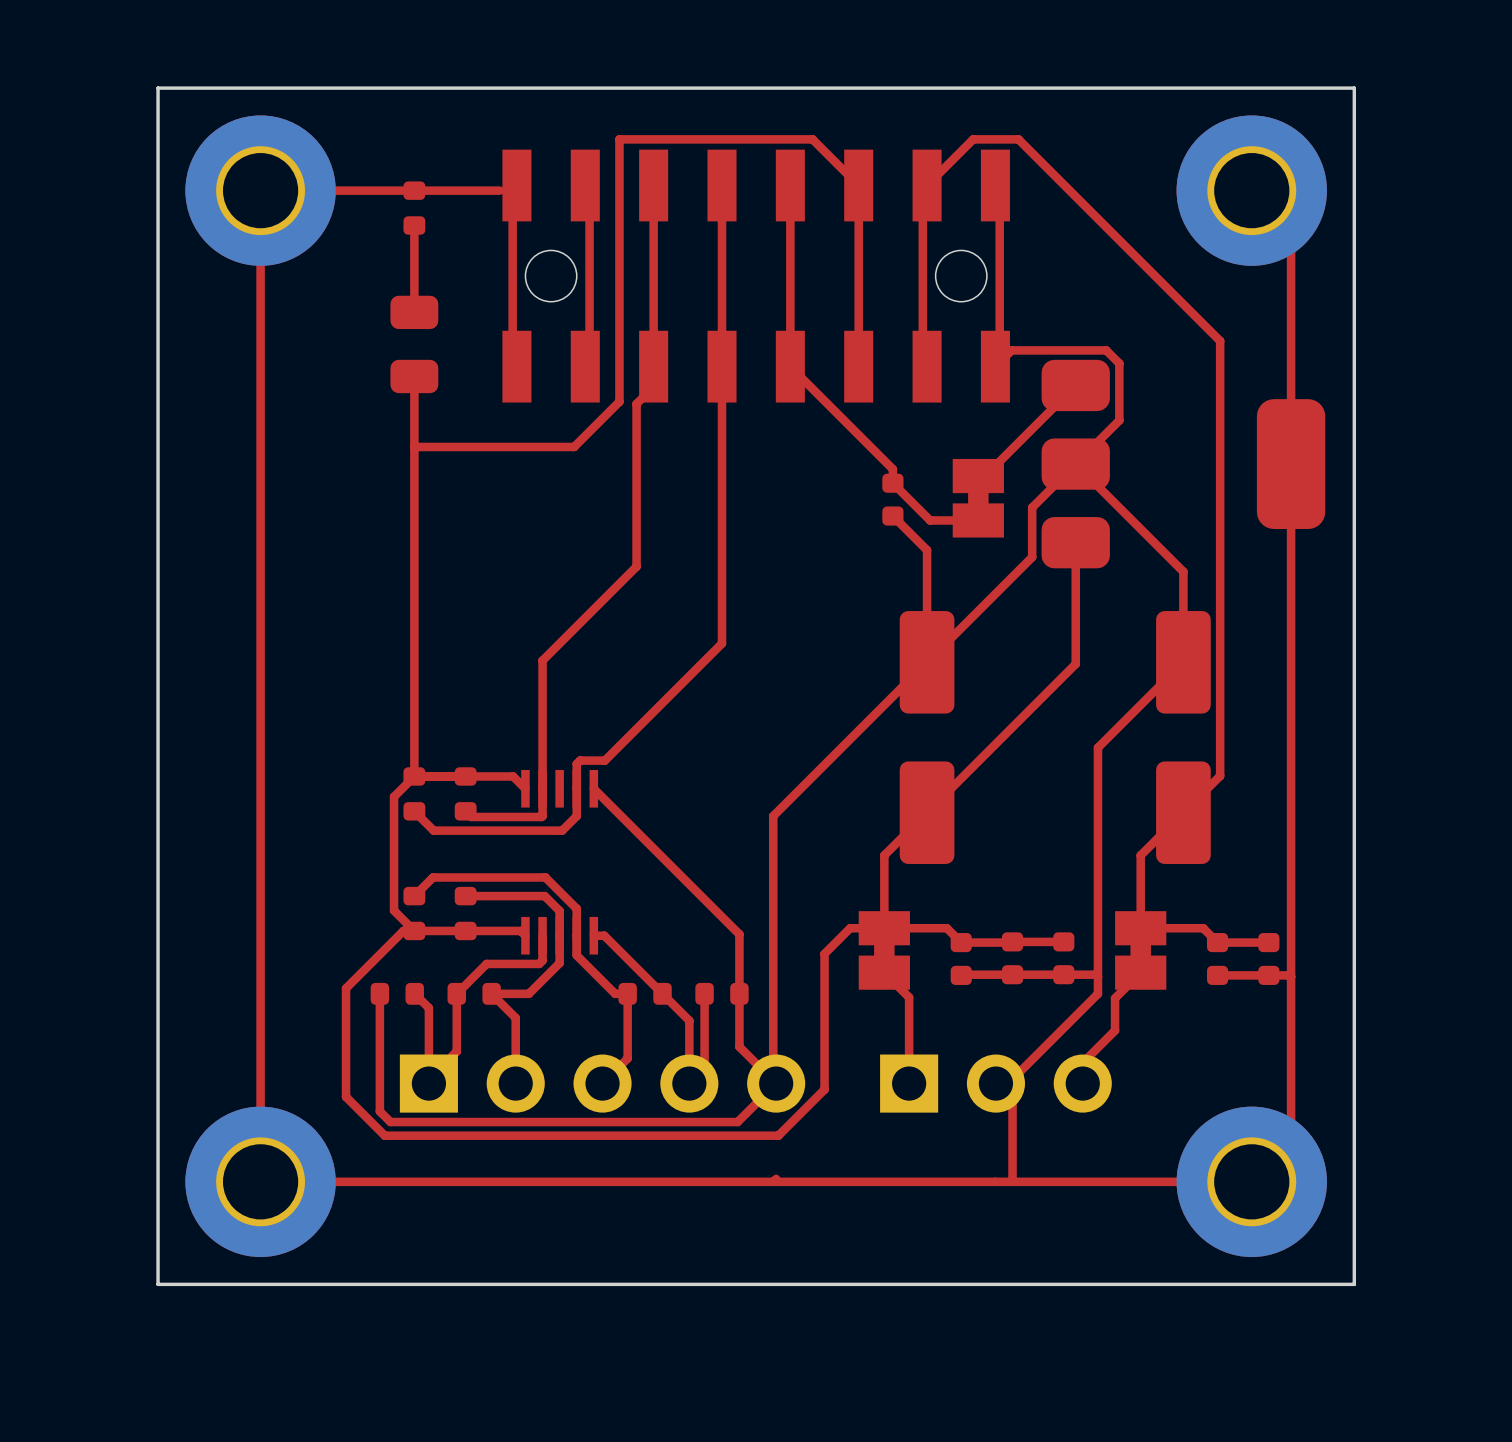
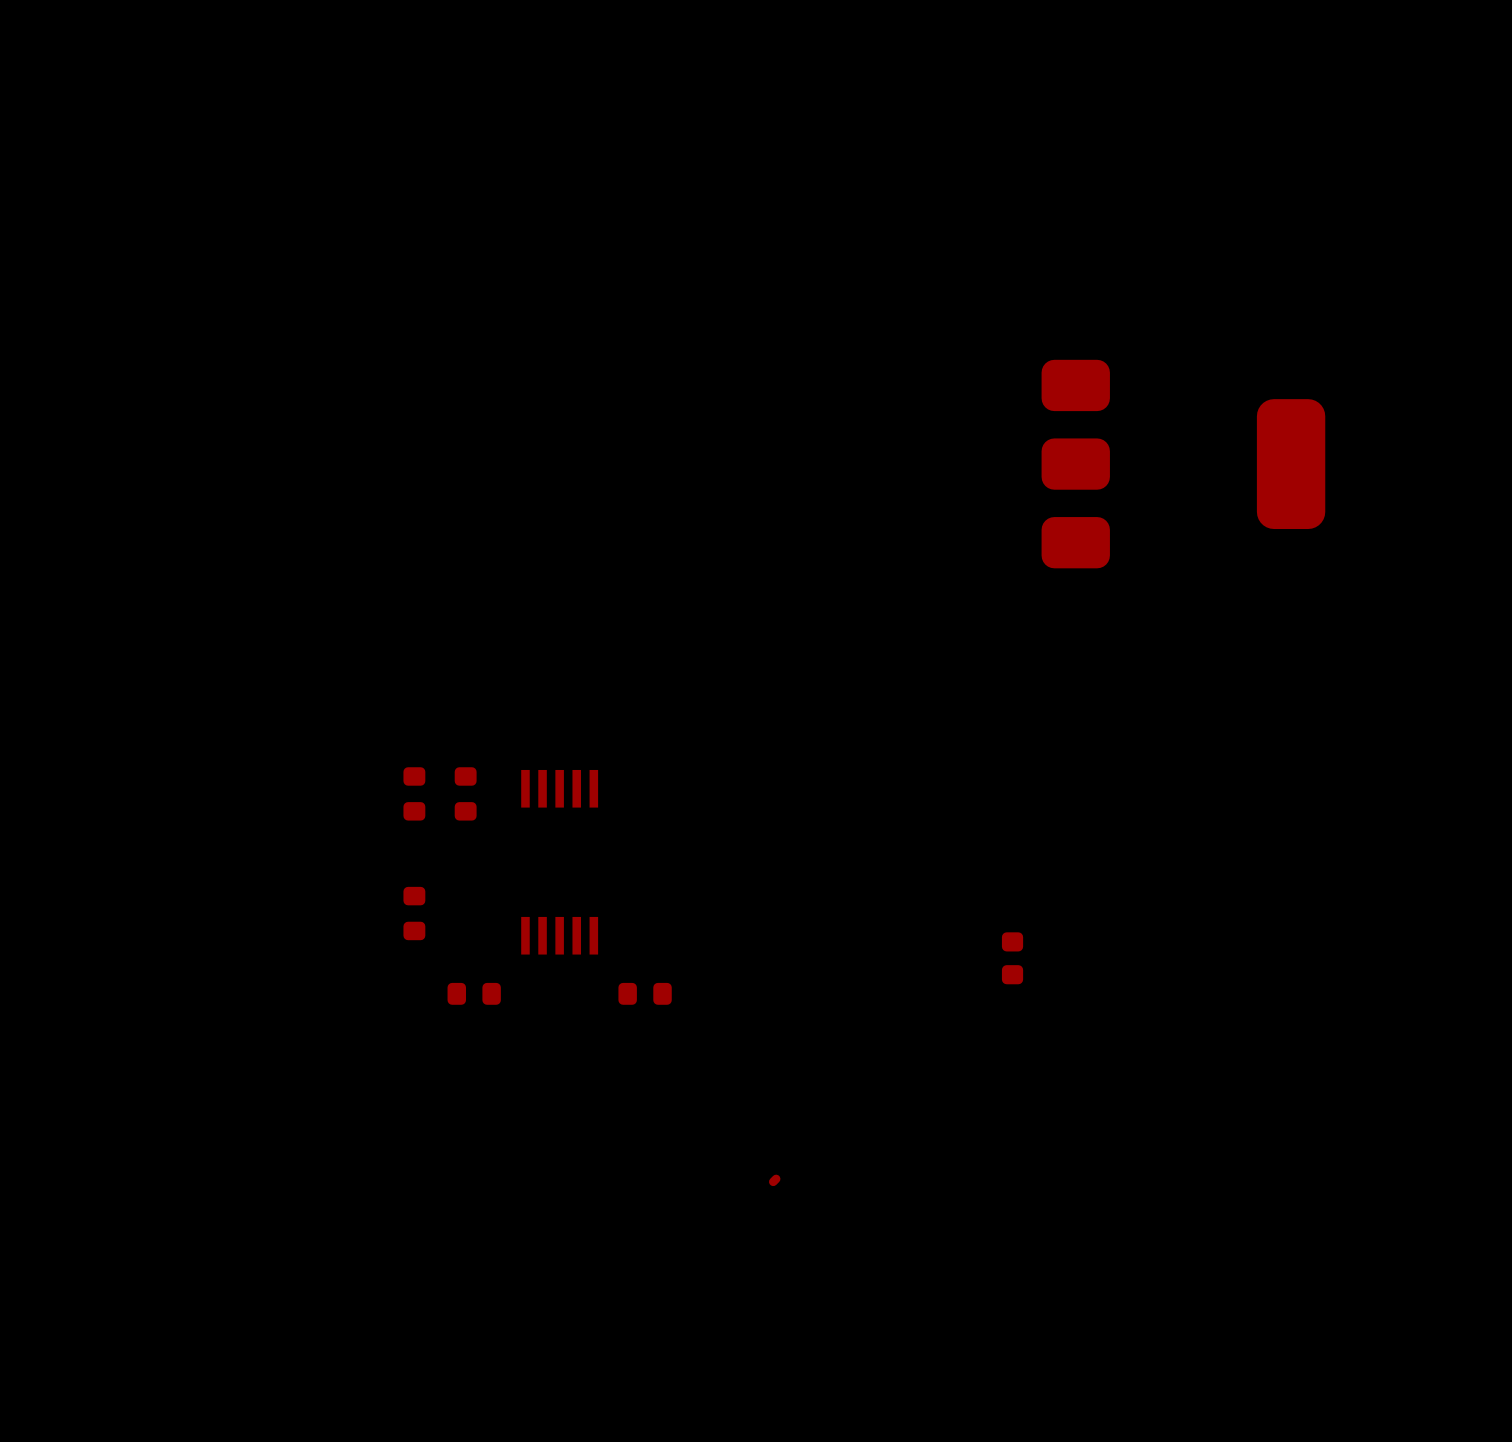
board edge: (1354, 88) (158, 88) (158, 1284) (1354, 1284) (1354, 88) -> none
top track: (585, 185) (589, 189) (589, 362) (585, 366) -> none
top track: (653, 185) (653, 386) (636, 403) (636, 566) (542, 660) (542, 816) (471, 816) (465, 811) -> none
top track: (722, 185) (722, 643) (604, 760) (580, 760) (576, 763) (576, 816) (562, 830) (433, 830) (414, 811) -> none
top track: (790, 185) (790, 366) (892, 469) (892, 483) (930, 520) (978, 520) -> none
top track: (995, 185) (999, 189) (999, 362) -> none
top track: (512, 189) (512, 362) (516, 366) -> none
part: (260, 190) -> none
top track: (1251, 190) (1291, 229) (1291, 1142) (1251, 1181) (260, 1181) (260, 190) (499, 190) -> none
part: (1251, 190) -> none
part: (414, 208) -> none
top track: (414, 225) (414, 312) -> none
part: (756, 276) -> none
part: (414, 344) -> none
top track: (858, 366) (858, 185) (812, 139) (619, 139) (619, 401) (574, 446) (414, 446) -> none
top track: (927, 366) (922, 362) (922, 189) (973, 139) (1018, 139) (1220, 341) (1220, 775) (1140, 855) (1140, 928) (1203, 928) (1217, 942) (1268, 942) -> none
top track: (995, 366) (1011, 350) (1106, 350) (1119, 363) (1119, 420) (1032, 507) (1032, 557) (773, 816) (773, 1080) -> none
top track: (414, 376) (414, 776) -> none
top track: (1075, 385) (985, 476) (978, 476) -> none
top track: (1075, 464) (1183, 571) (1183, 662) (1097, 747) (1097, 993) (1012, 1079) (1012, 1181) -> none
part: (978, 498) -> none
part: (892, 499) -> none
top track: (892, 516) (927, 550) (927, 662) -> none
top track: (1075, 542) (1075, 664) (884, 855) (884, 928) -> none
part: (927, 737) -> none
part: (1183, 737) -> none
top track: (414, 776) (513, 776) (525, 788) -> none
top track: (414, 776) (394, 796) (394, 910) (414, 930) -> none
top track: (593, 788) (739, 934) (739, 1046) (776, 1083) (737, 1122) (390, 1122) (379, 1111) (379, 993) -> none
top track: (414, 896) (433, 877) (545, 877) (576, 908) (576, 955) (615, 993) (627, 993) (627, 1058) (602, 1083) -> none
top track: (465, 896) (544, 896) (559, 910) (559, 963) (528, 993) (491, 993) (515, 1017) (515, 1083) -> none
part: (465, 913) -> none
top track: (525, 935) (520, 930) (403, 930) (346, 988) (346, 1096) (384, 1135) (778, 1135) (824, 1089) (824, 953) (850, 928) (946, 928) (961, 942) (1063, 941) -> none
top track: (542, 935) (542, 960) (539, 963) (486, 963) (456, 993) (456, 1051) (428, 1079) -> none
top track: (593, 935) (604, 935) (689, 1020) (689, 1083) (704, 1068) (704, 993) -> none
part: (884, 950) -> none
part: (1140, 950) -> none
part: (961, 958) -> none
part: (1063, 958) -> none
part: (1217, 958) -> none
part: (1268, 958) -> none
top track: (884, 972) (909, 997) (909, 1083) -> none
top track: (1140, 972) (1115, 998) (1115, 1030) (1082, 1062) (1082, 1083) -> none
top track: (961, 975) (1095, 974) (1097, 976) -> none
top track: (1217, 975) (1291, 976) -> none
part: (397, 993) -> none
top track: (414, 993) (428, 1008) (428, 1083) -> none
part: (722, 993) -> none
part: (602, 1083) -> none
part: (995, 1083) -> none
part: (260, 1181) -> none
part: (1251, 1181) -> none

